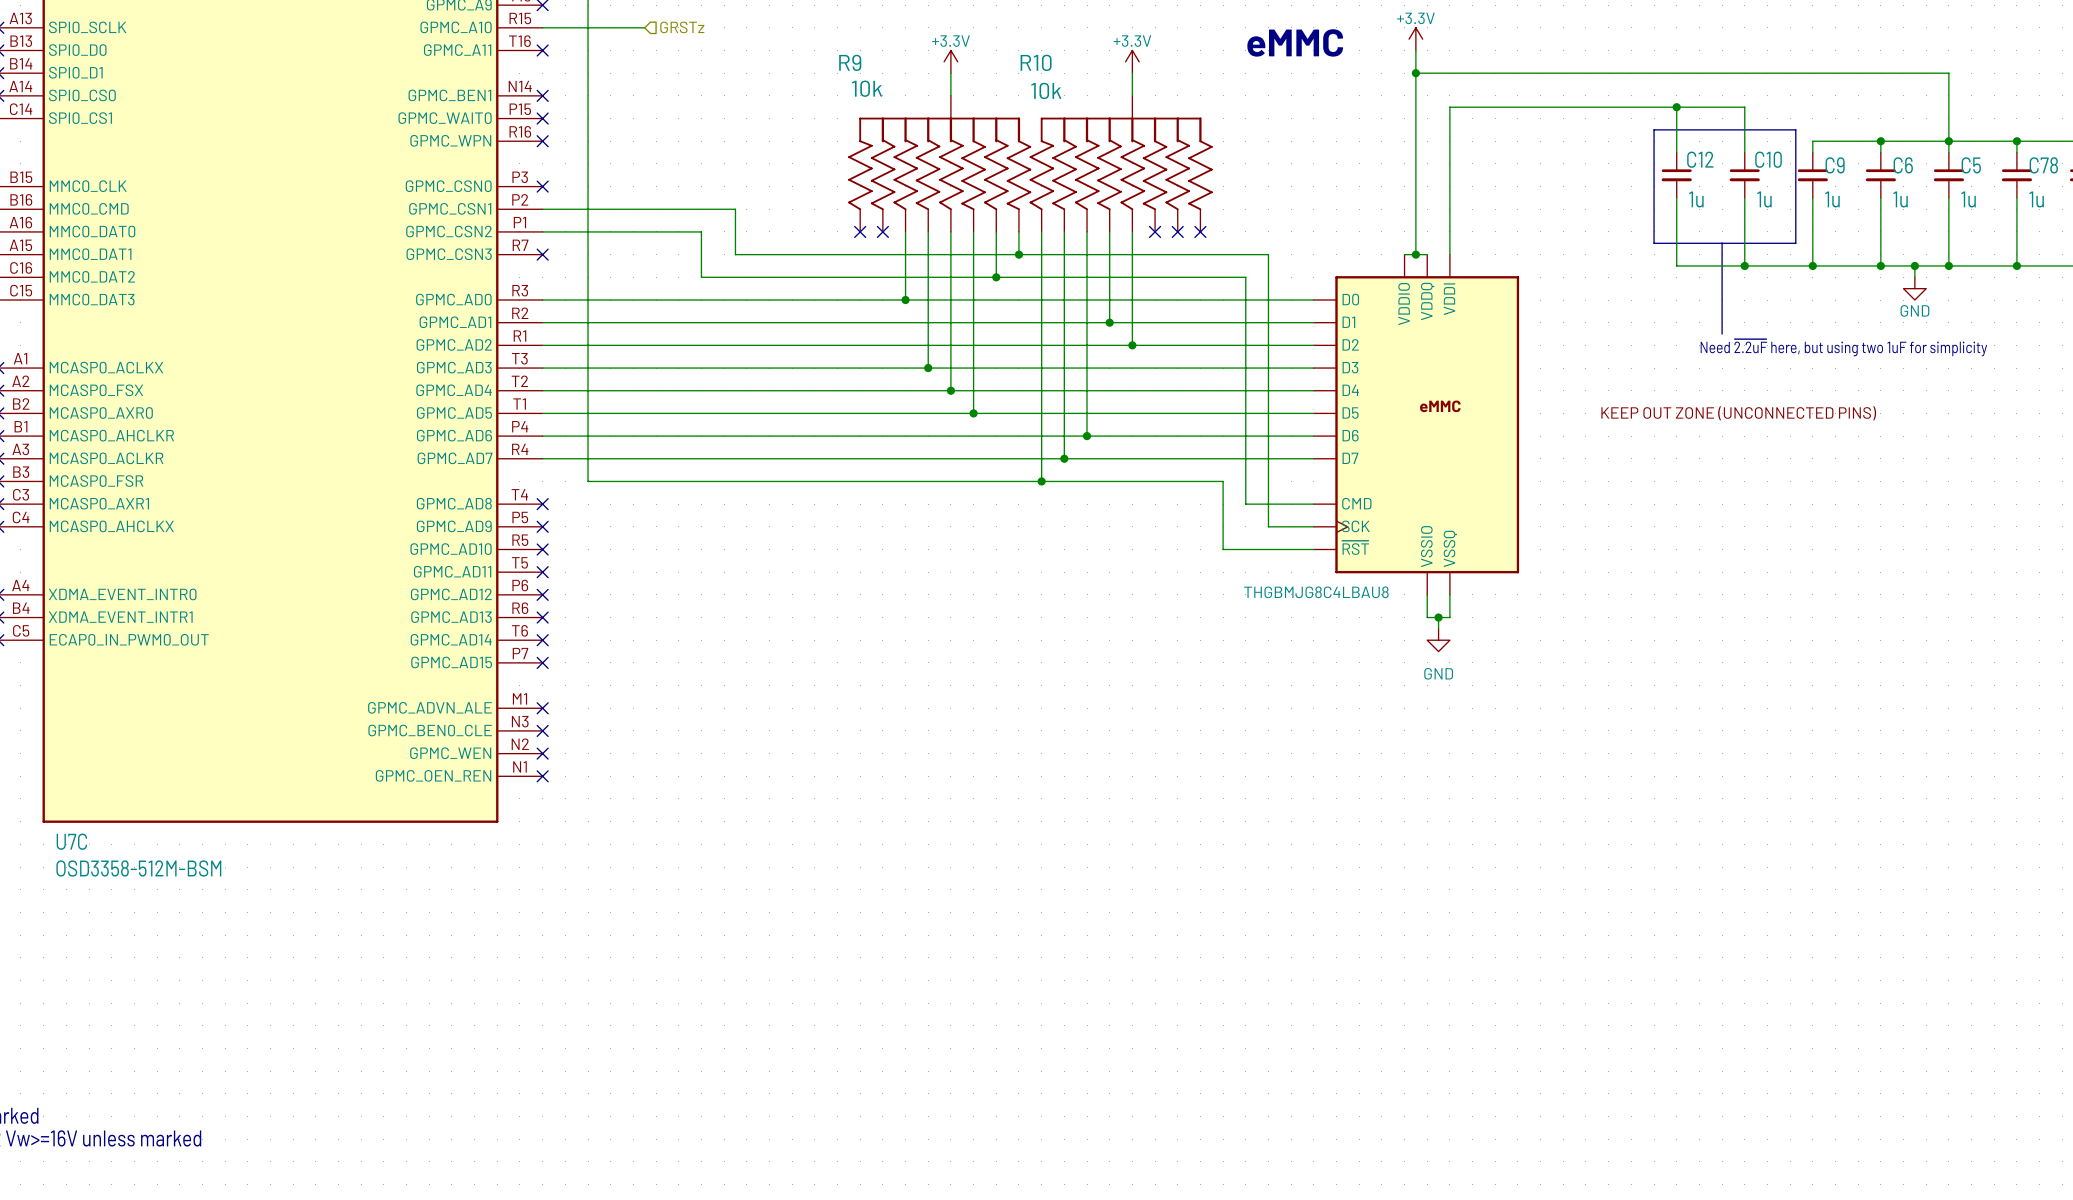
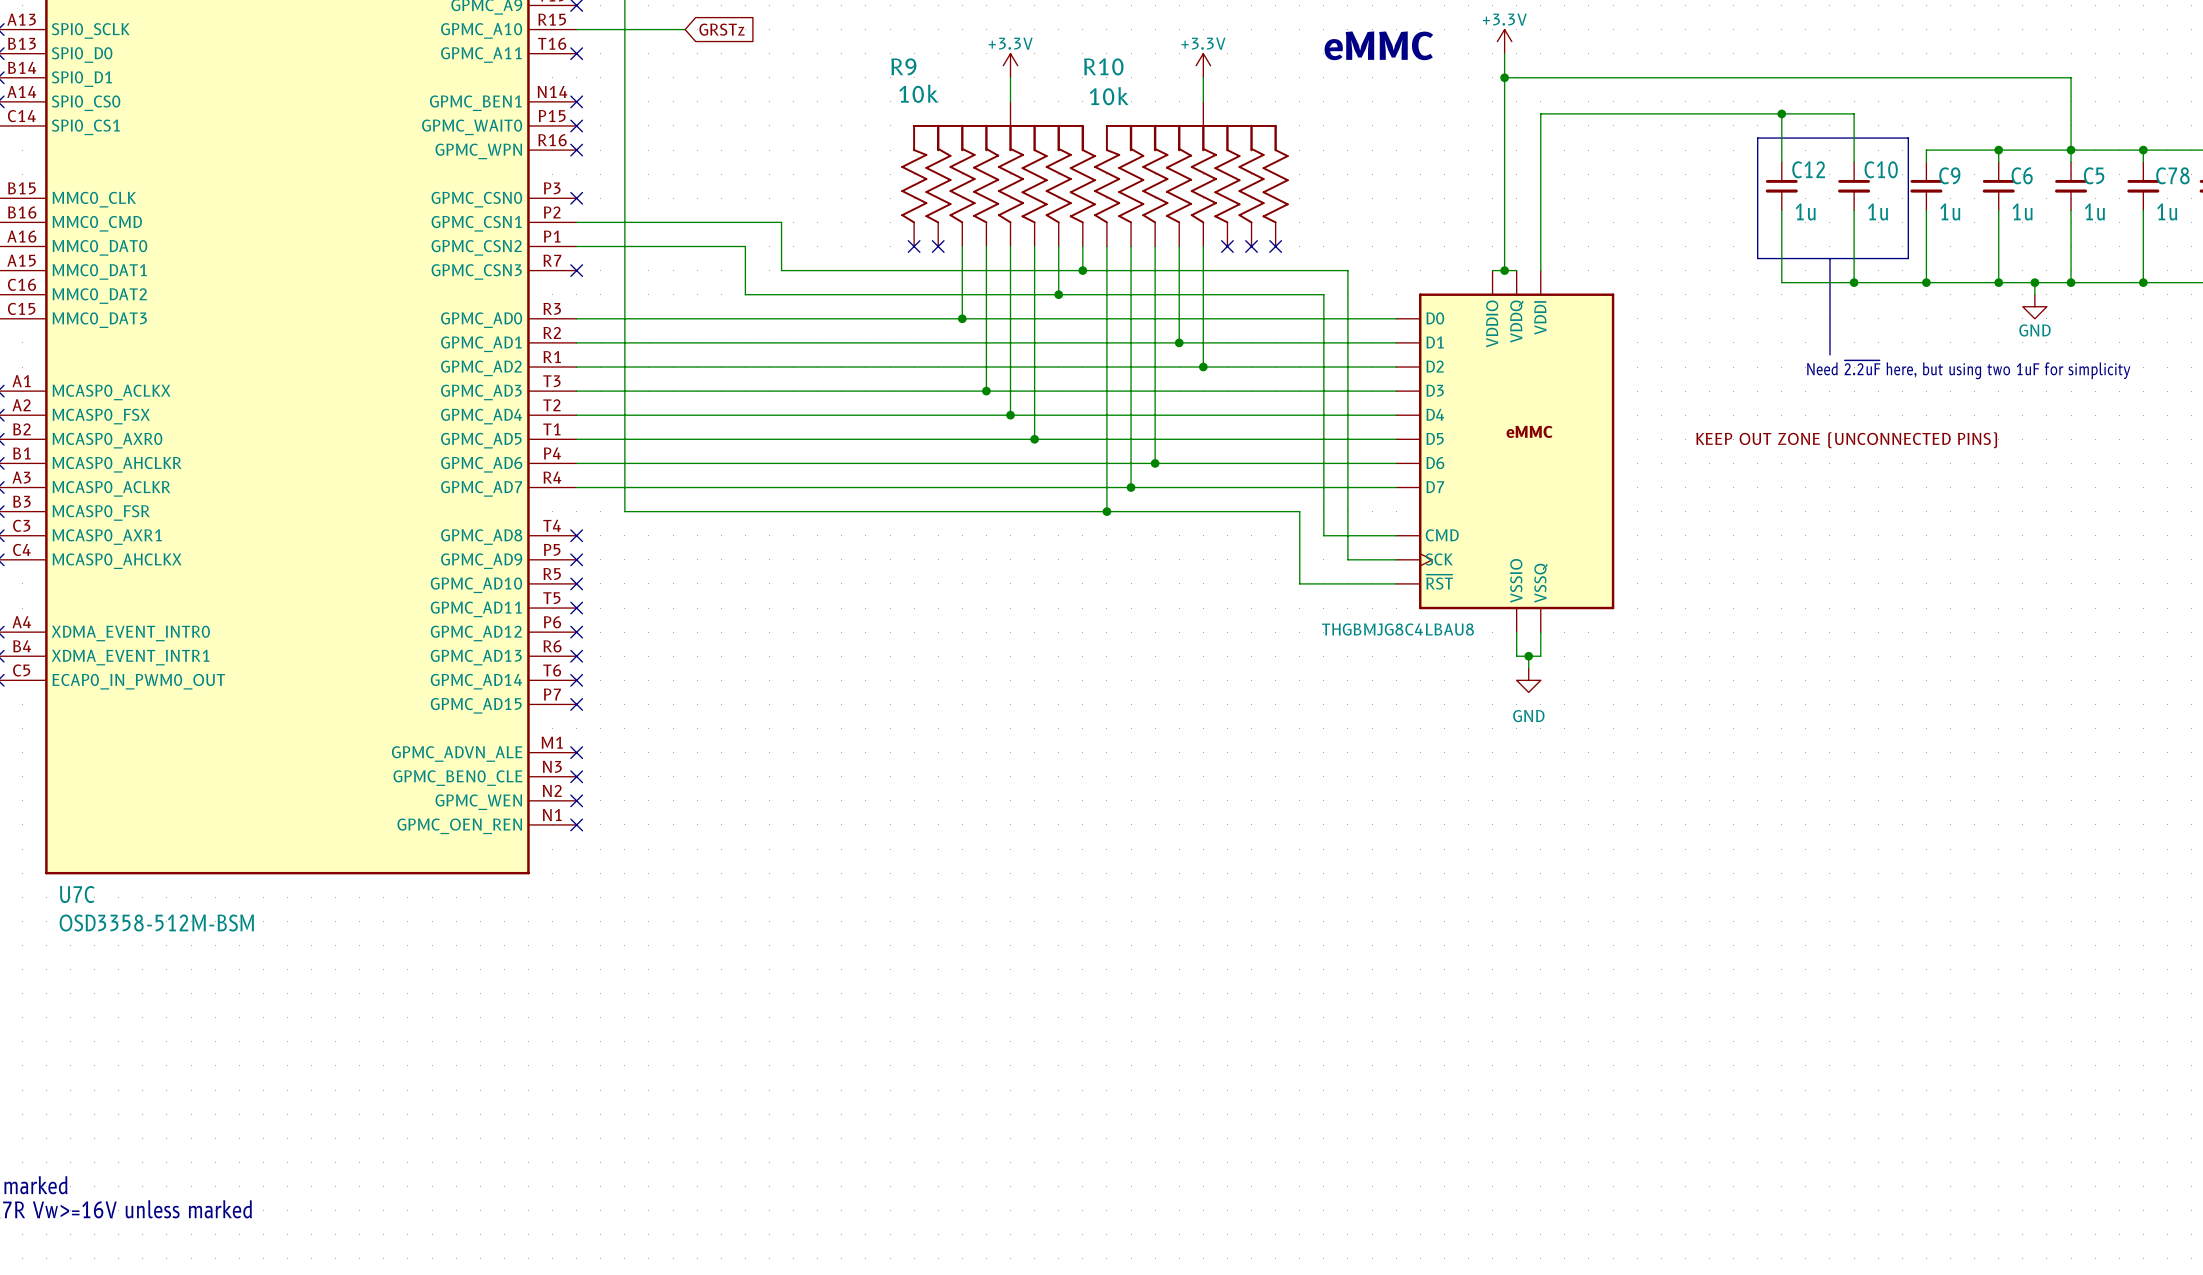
global label: none -> GRSTz (722, 29)
hierarchical label: GRSTz (682, 27) -> none

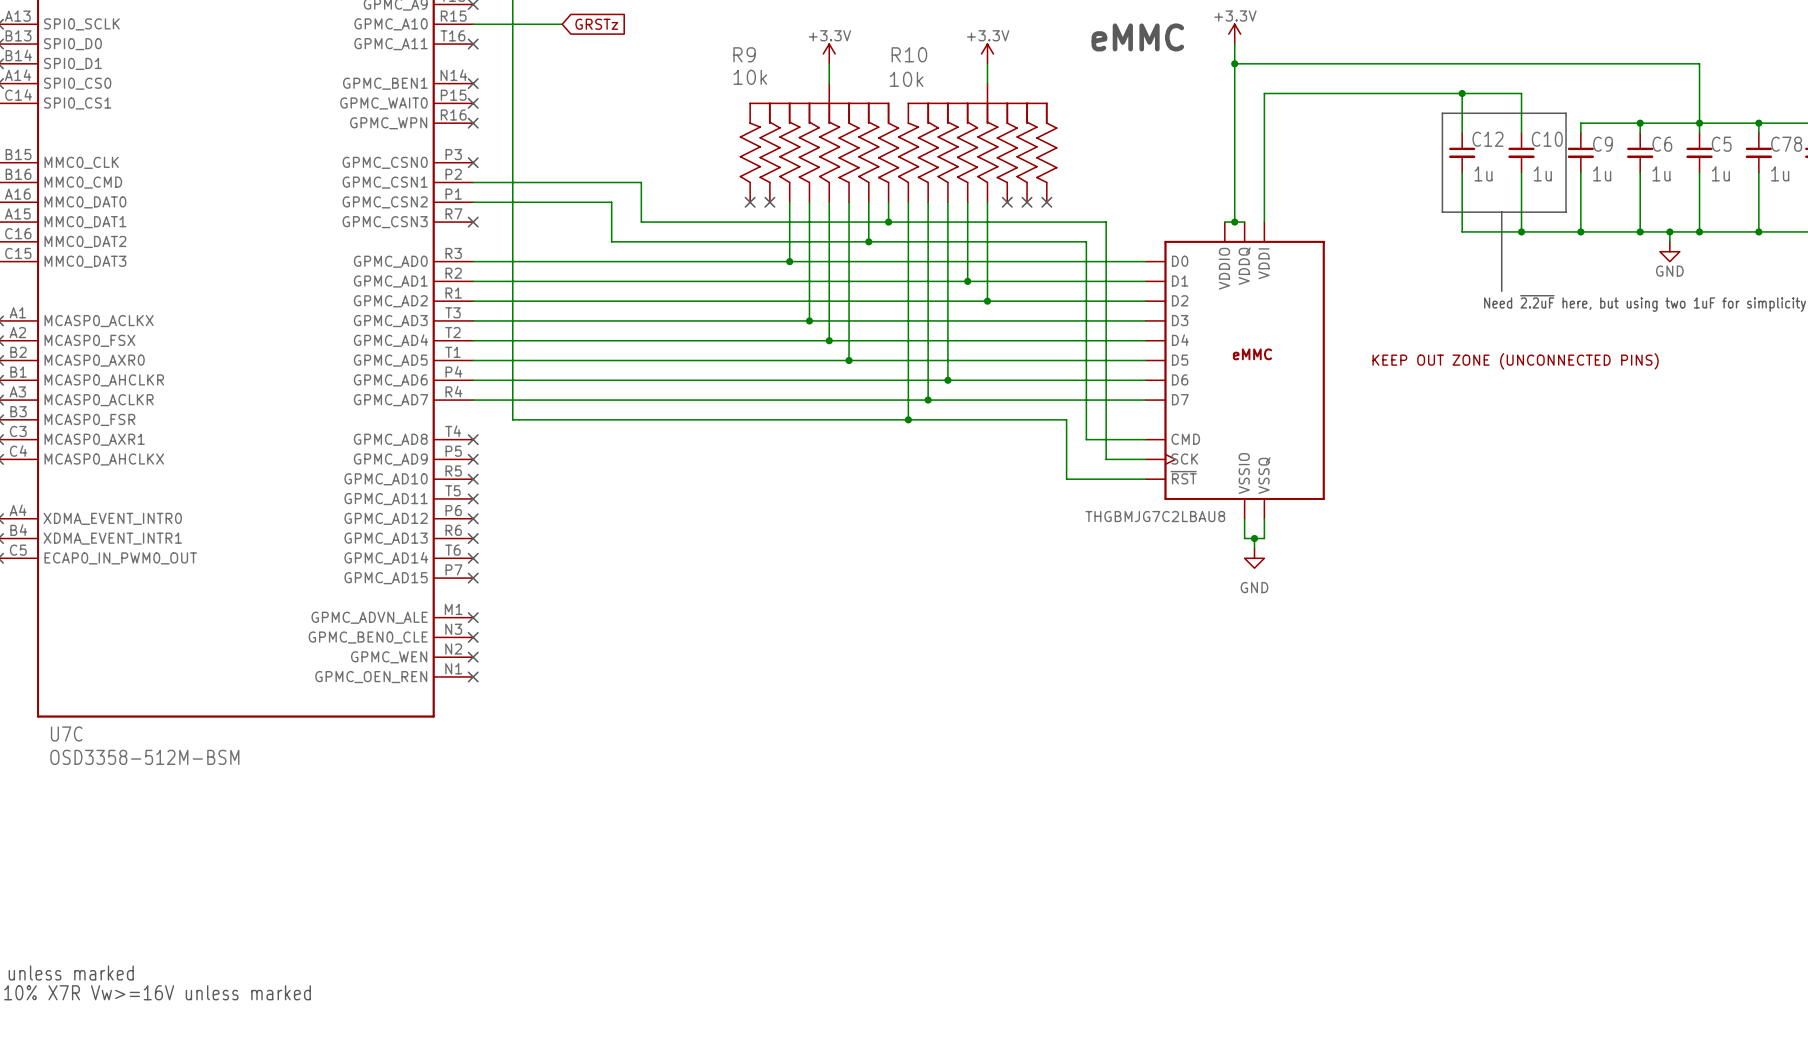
part value: THGBMJG8C4LBAU8 (1397, 629) -> THGBMJG7C2LBAU8 (1155, 516)

